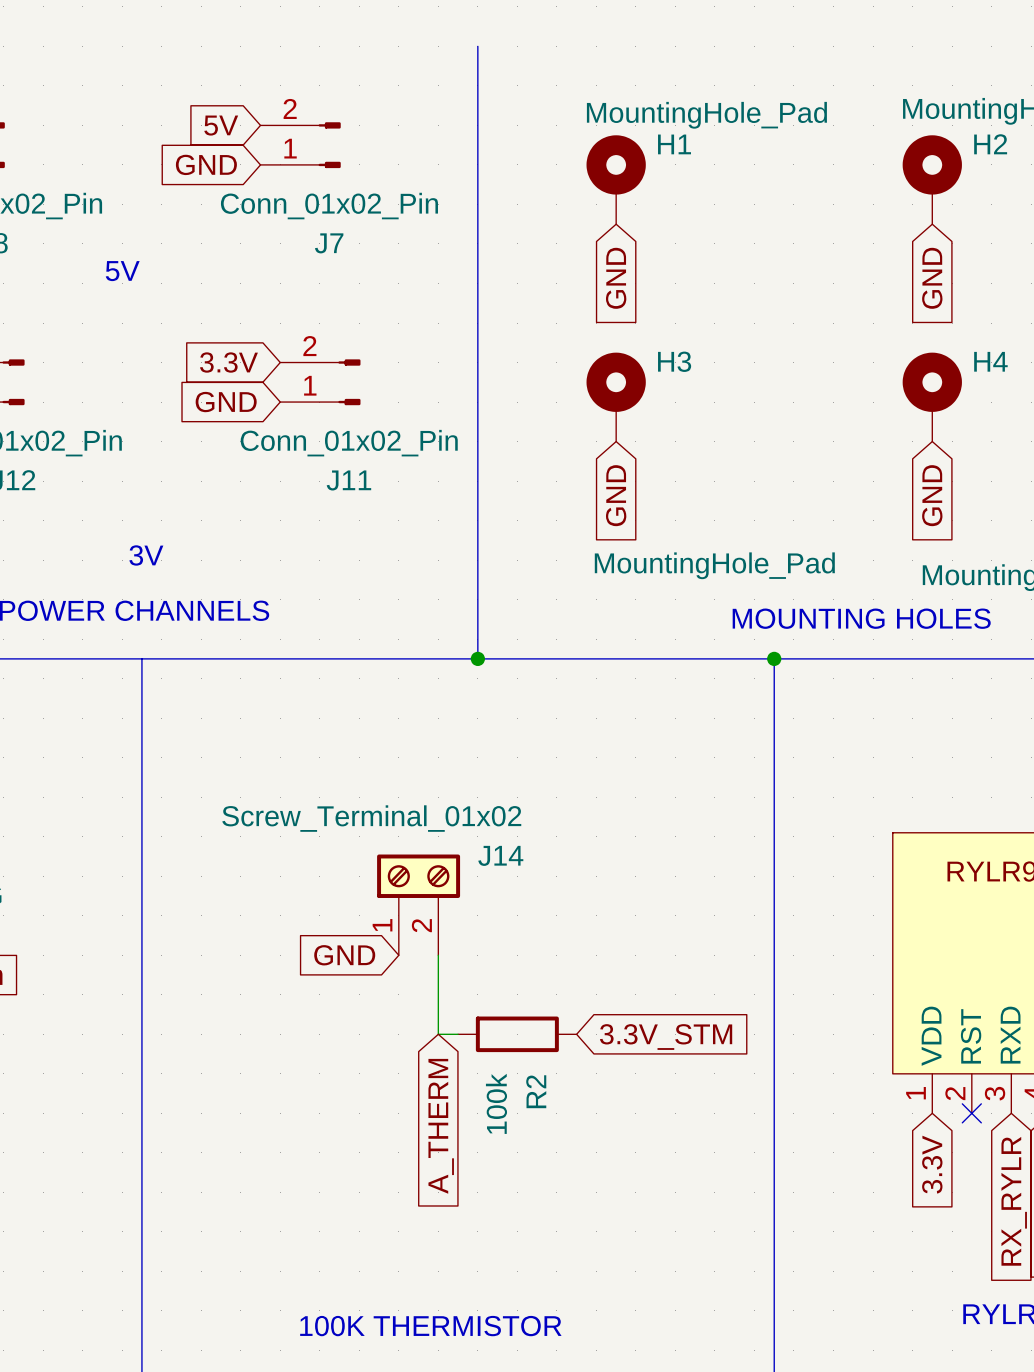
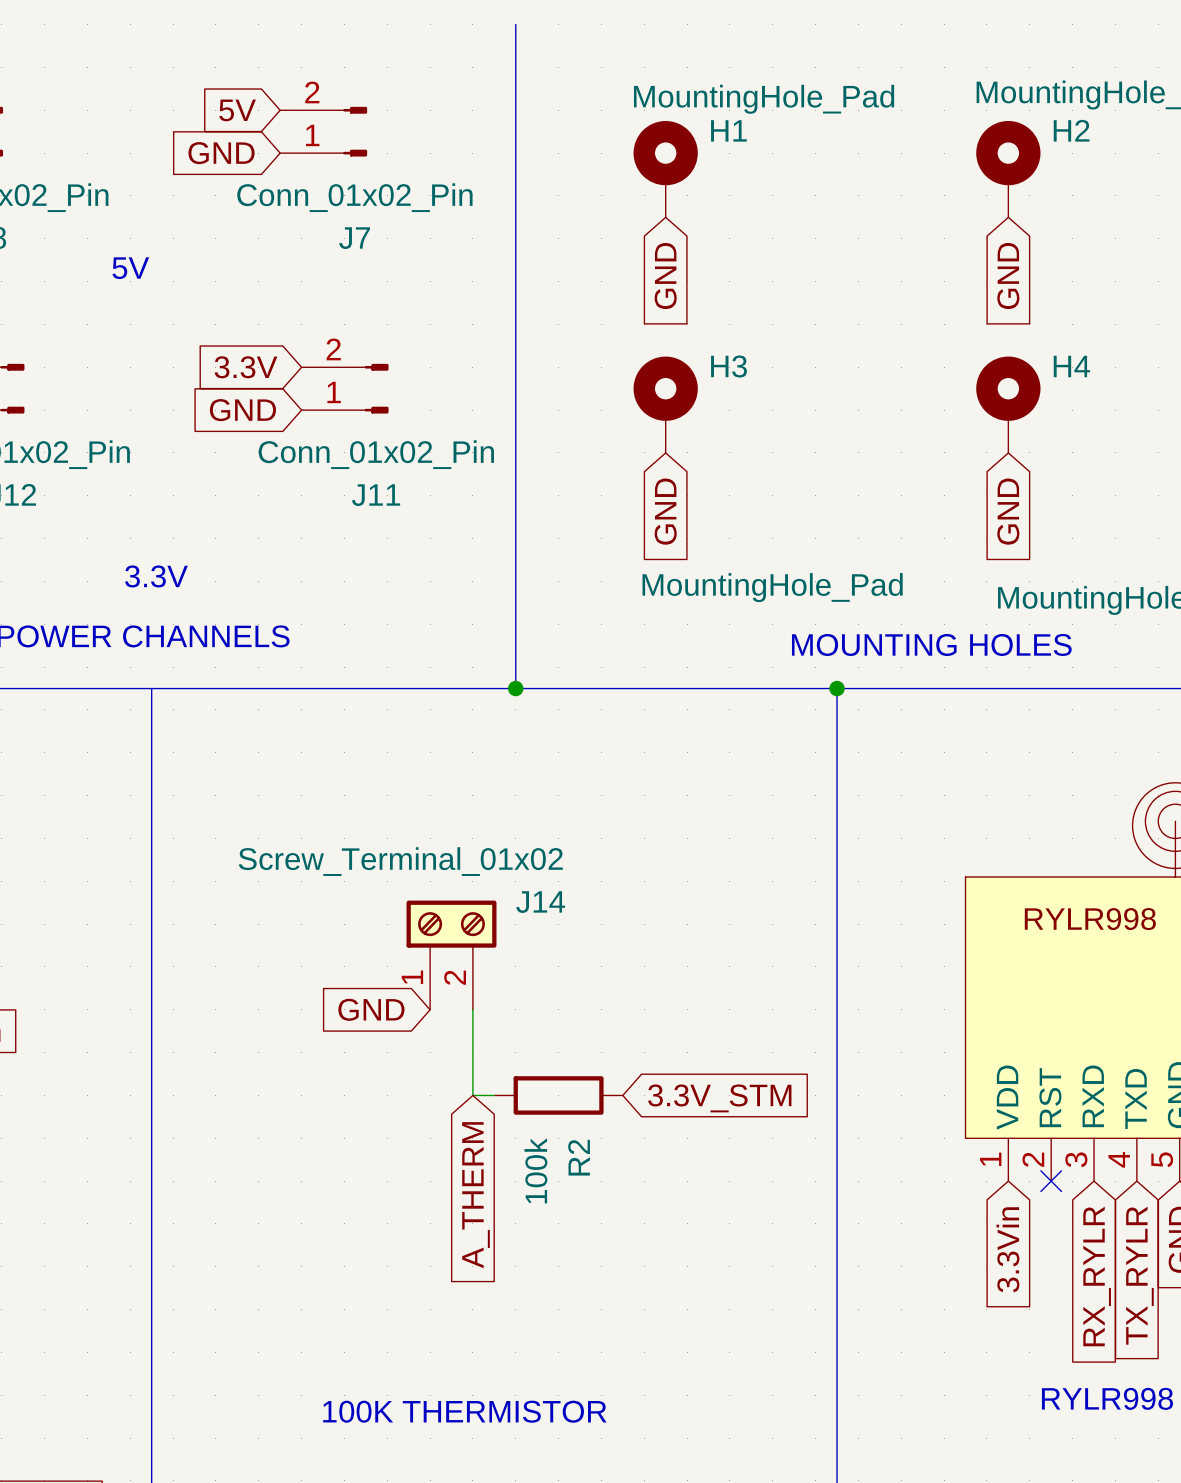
text: 3V (146, 555) -> 3.3V (156, 576)
global label: 3.3V (932, 1164) -> 3.3Vin (1007, 1249)

